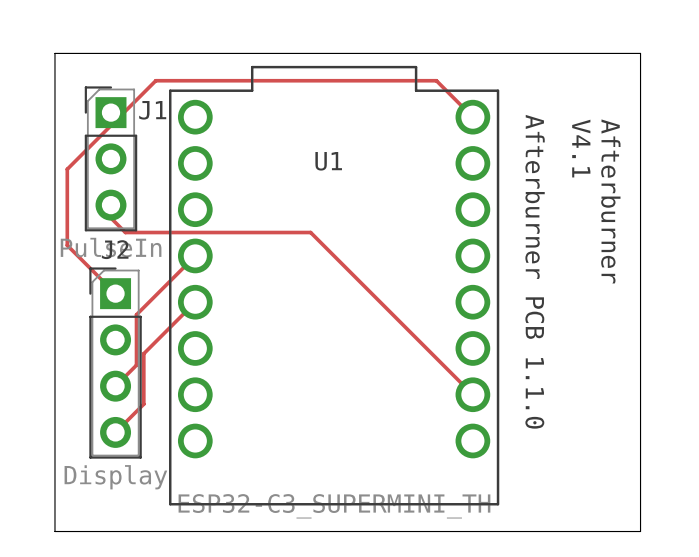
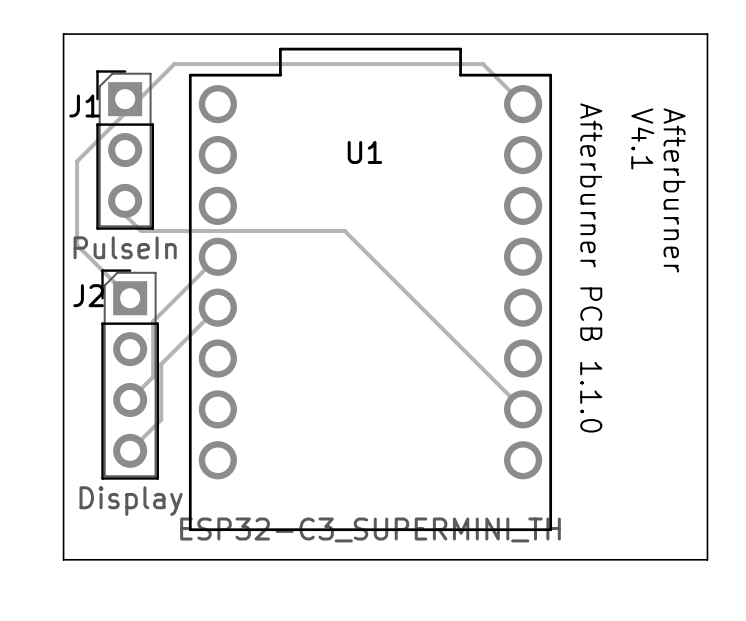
J1 name position: J1 (152, 110) -> J1 (84, 106)
J2 name position: J2 (115, 249) -> J2 (88, 295)

